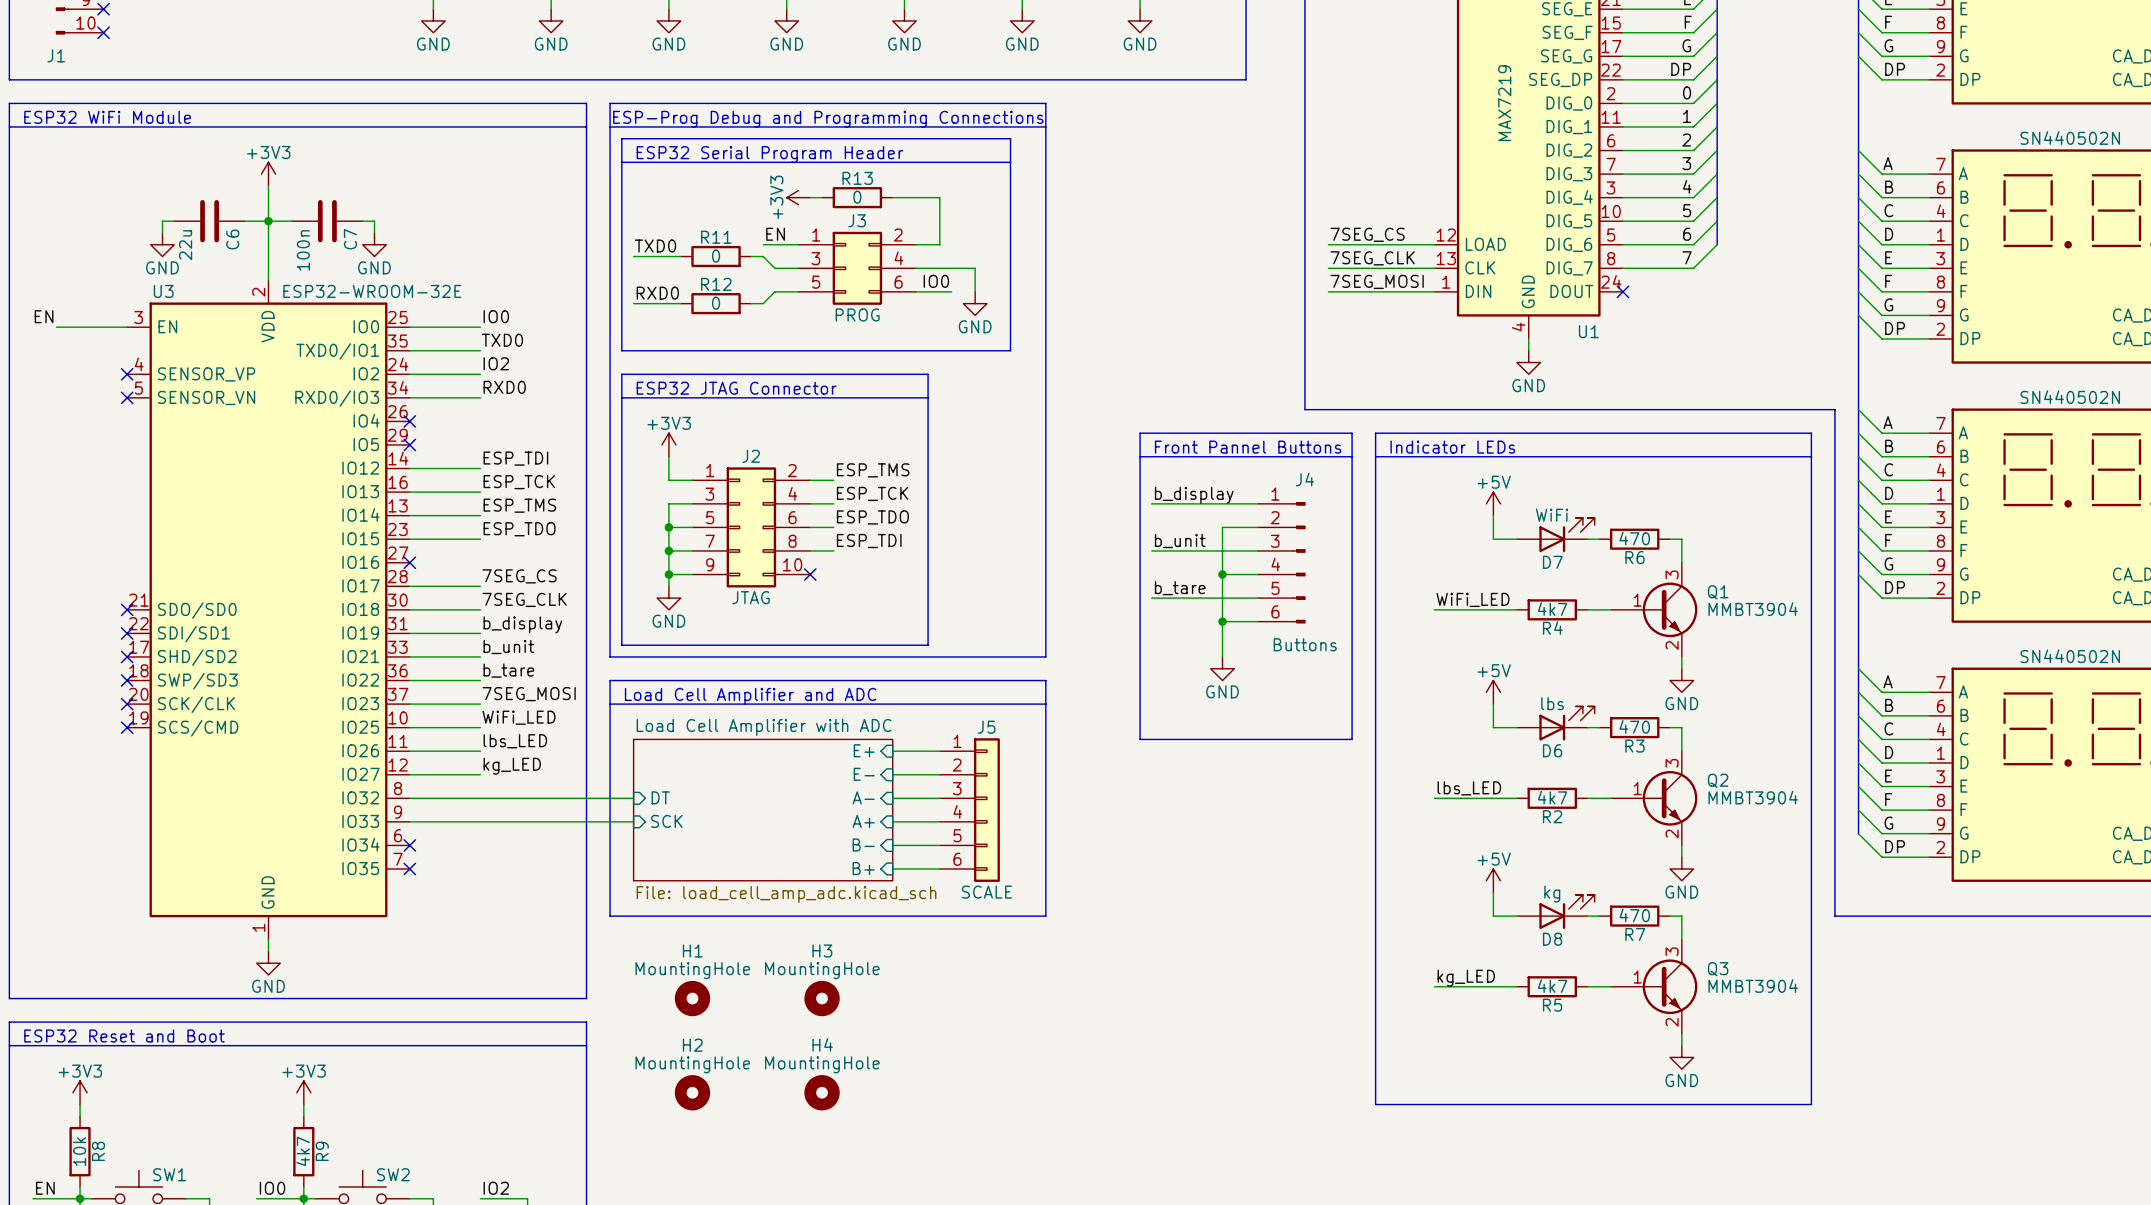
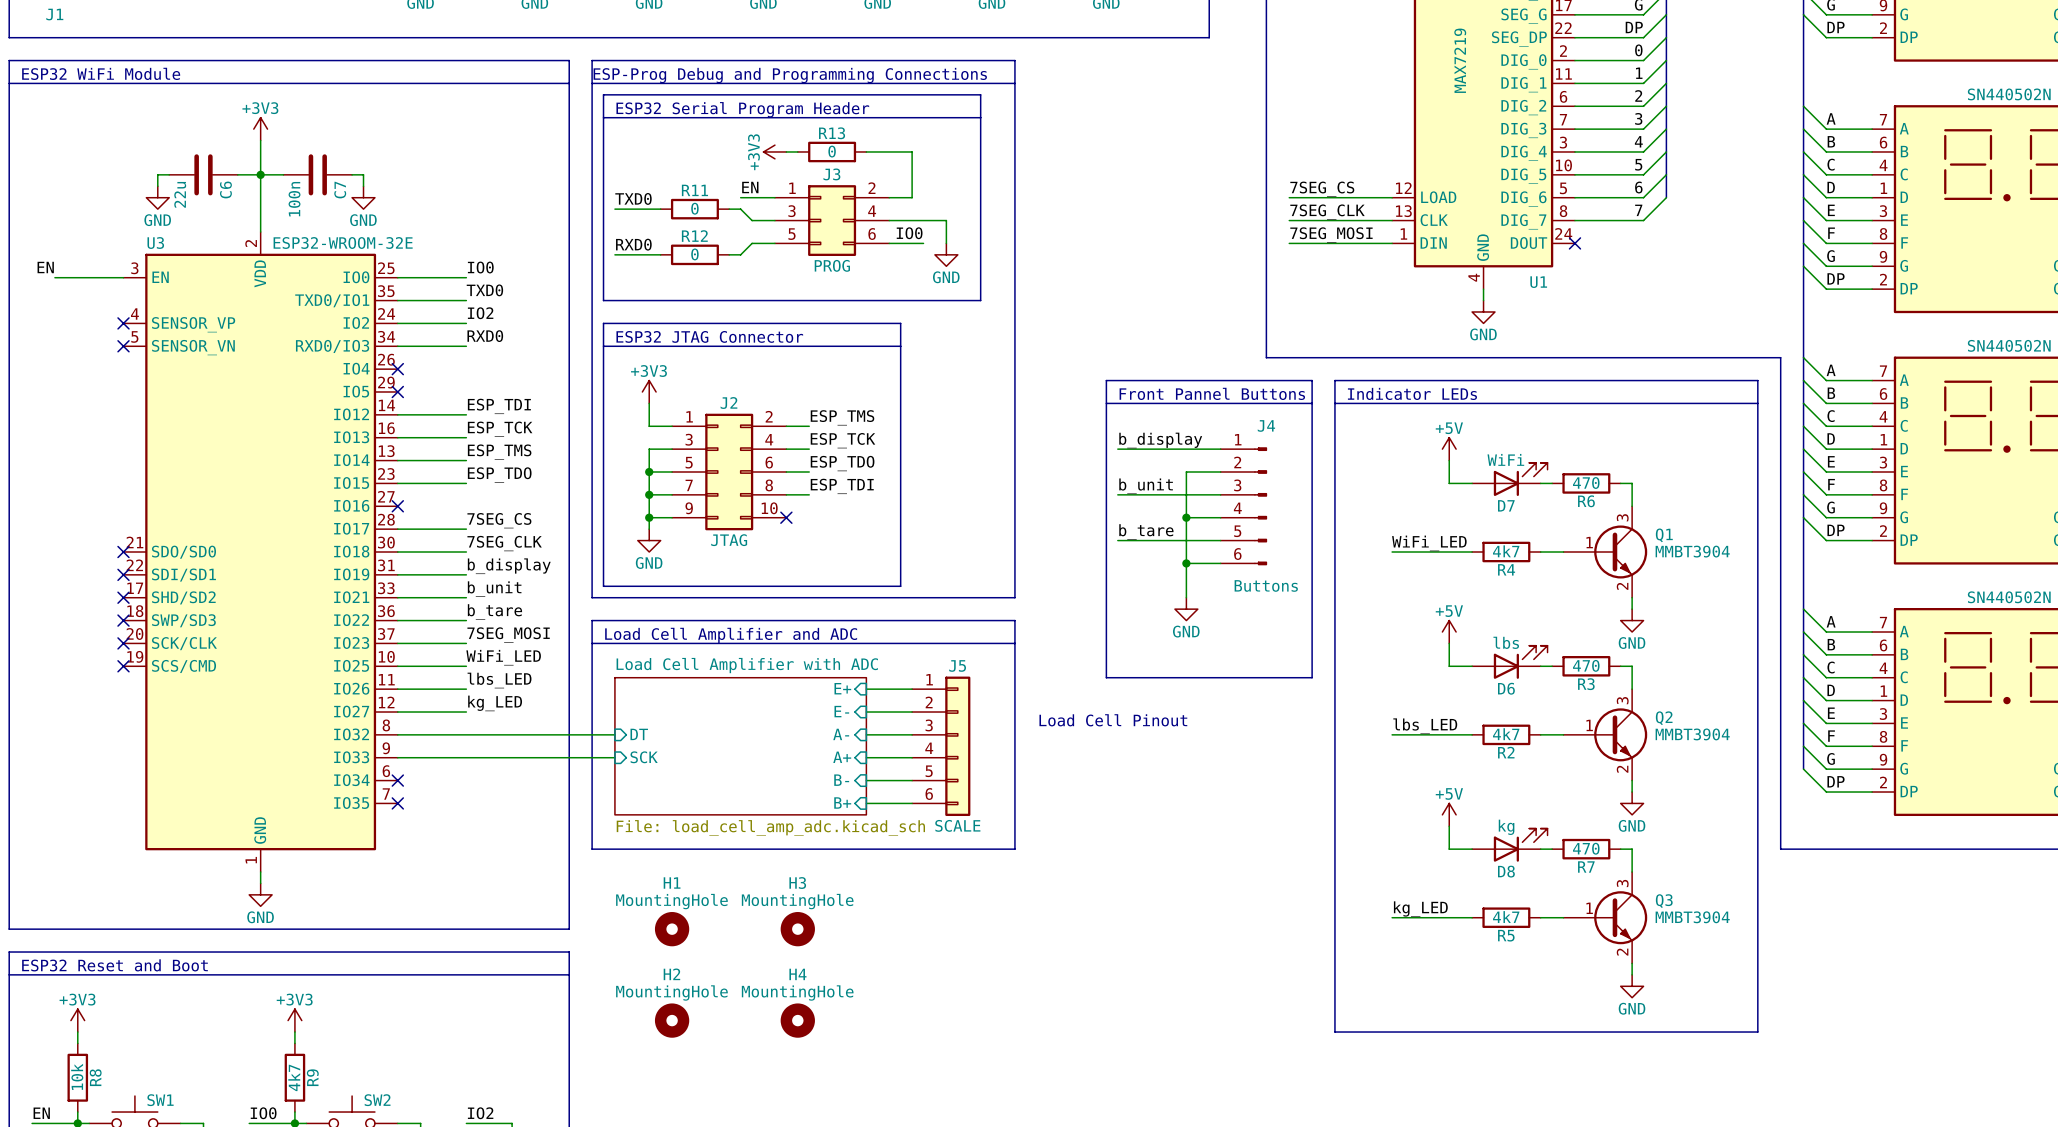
text: none -> Load Cell Pinout (1113, 720)

